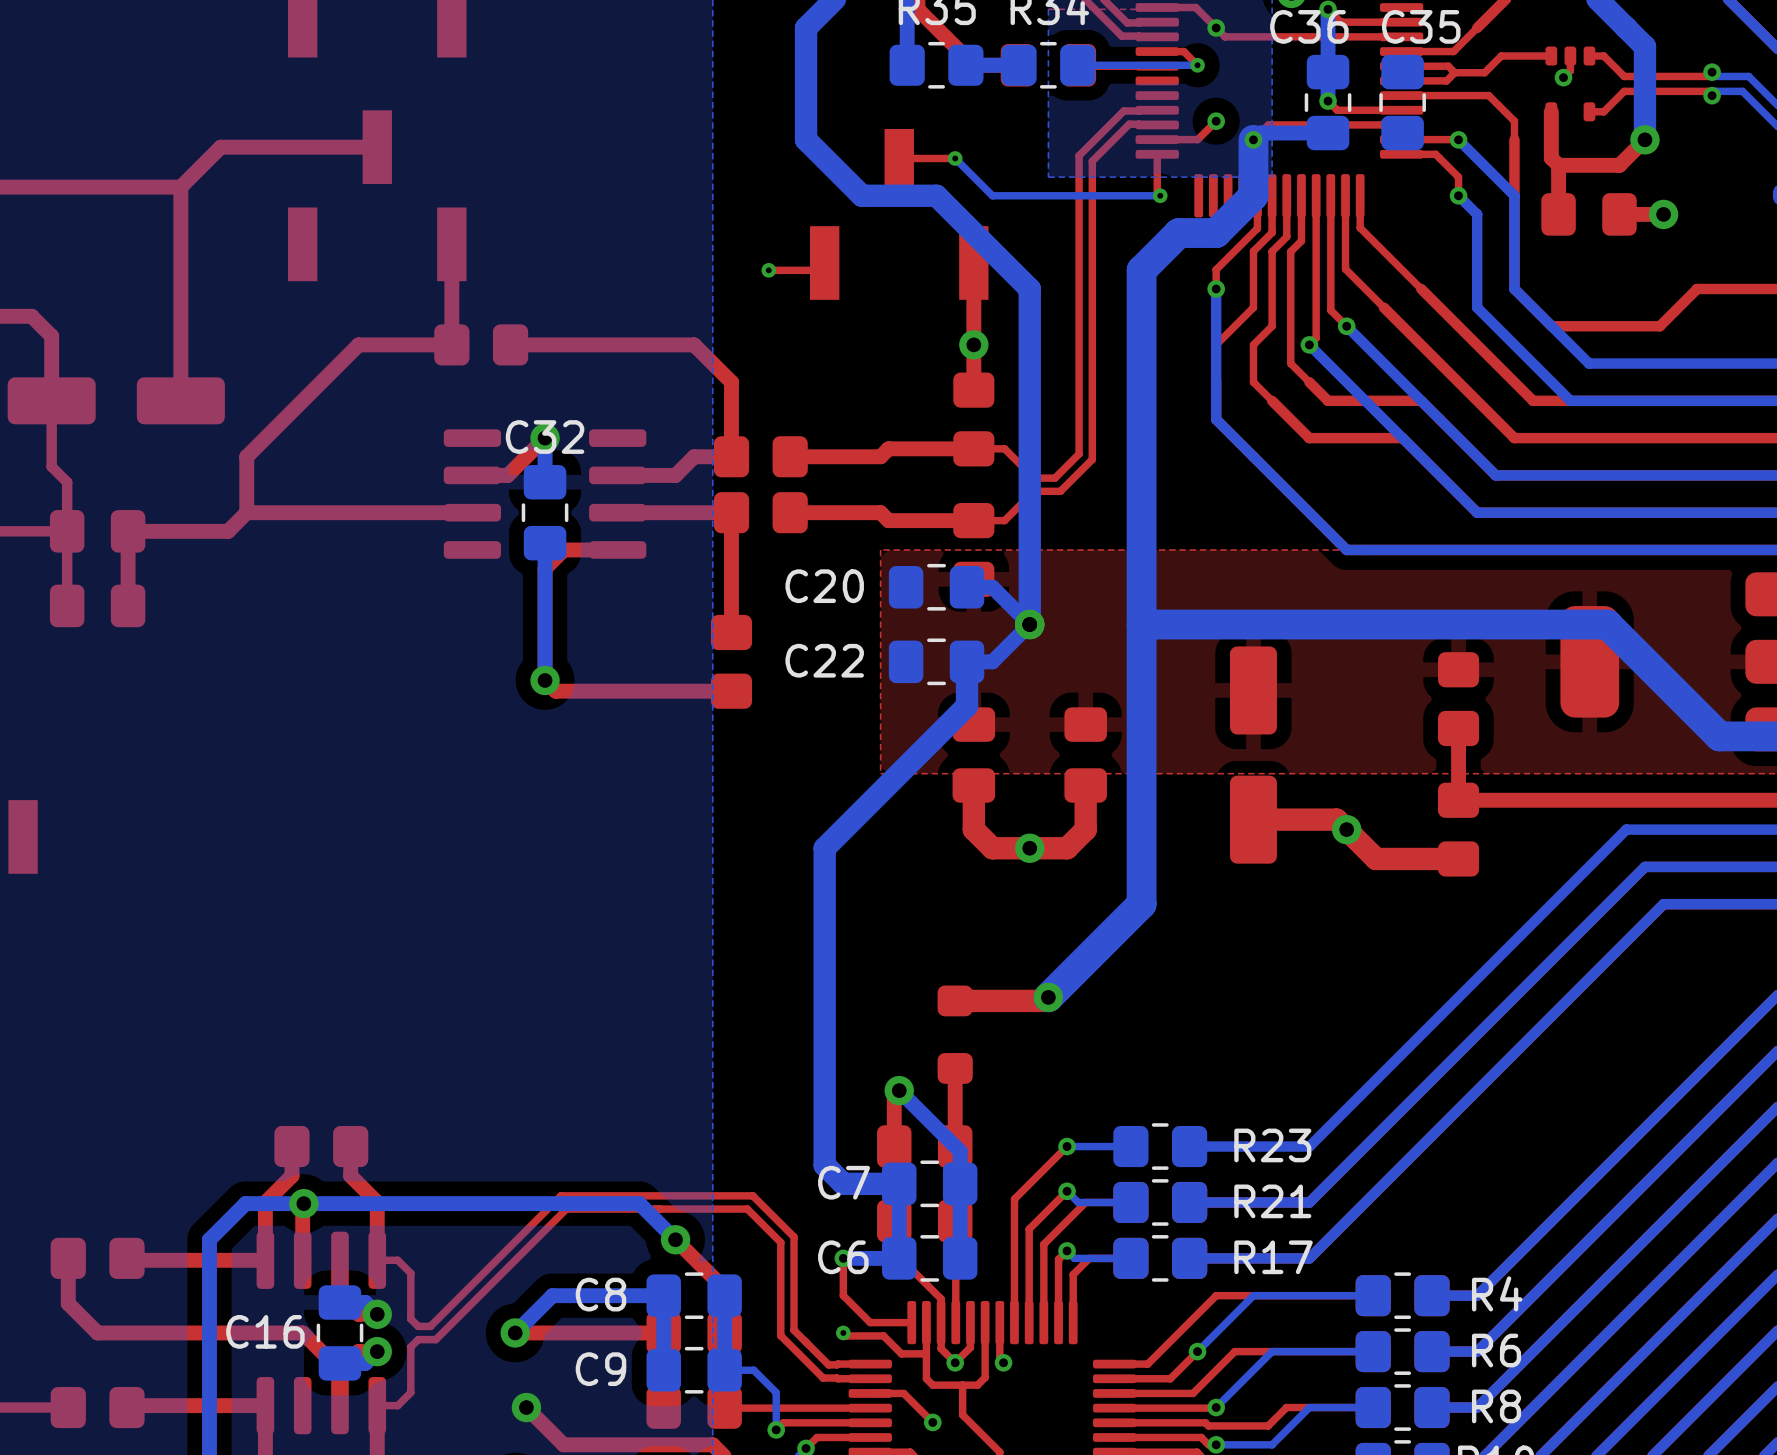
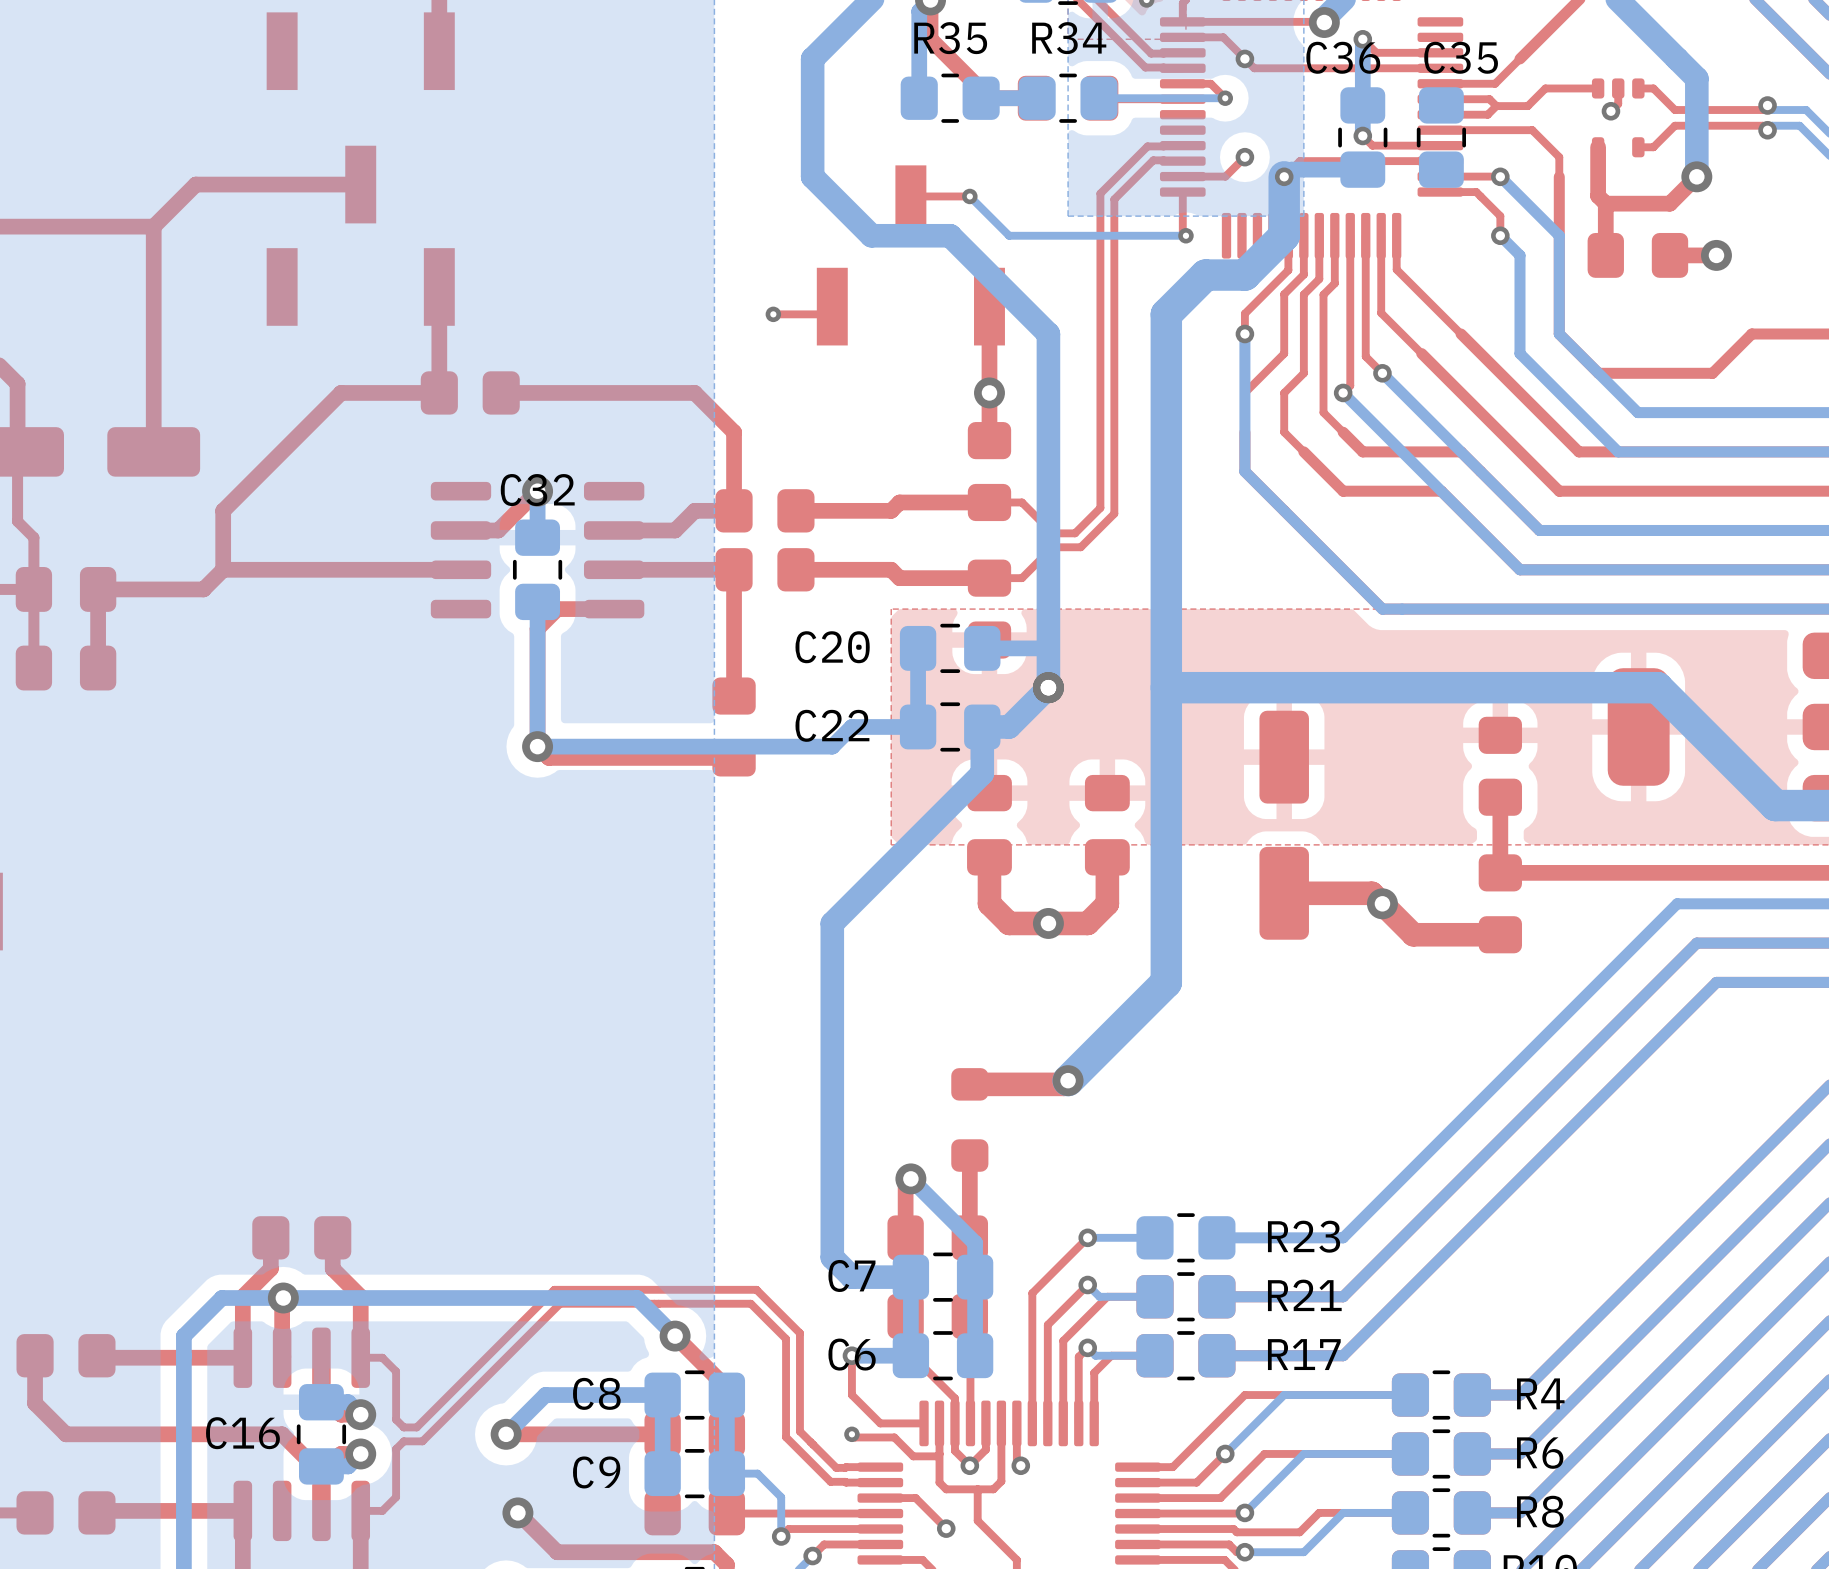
bottom track: none -> (918, 648) (918, 726) (851, 726) (832, 746) (537, 746)
bottom track: (992, 587) (1029, 624) -> (1009, 648) (1048, 648)
bottom track width: thin (1029, 624) (992, 661) (967, 661) -> thick (1048, 687) (1009, 726) (982, 726)

